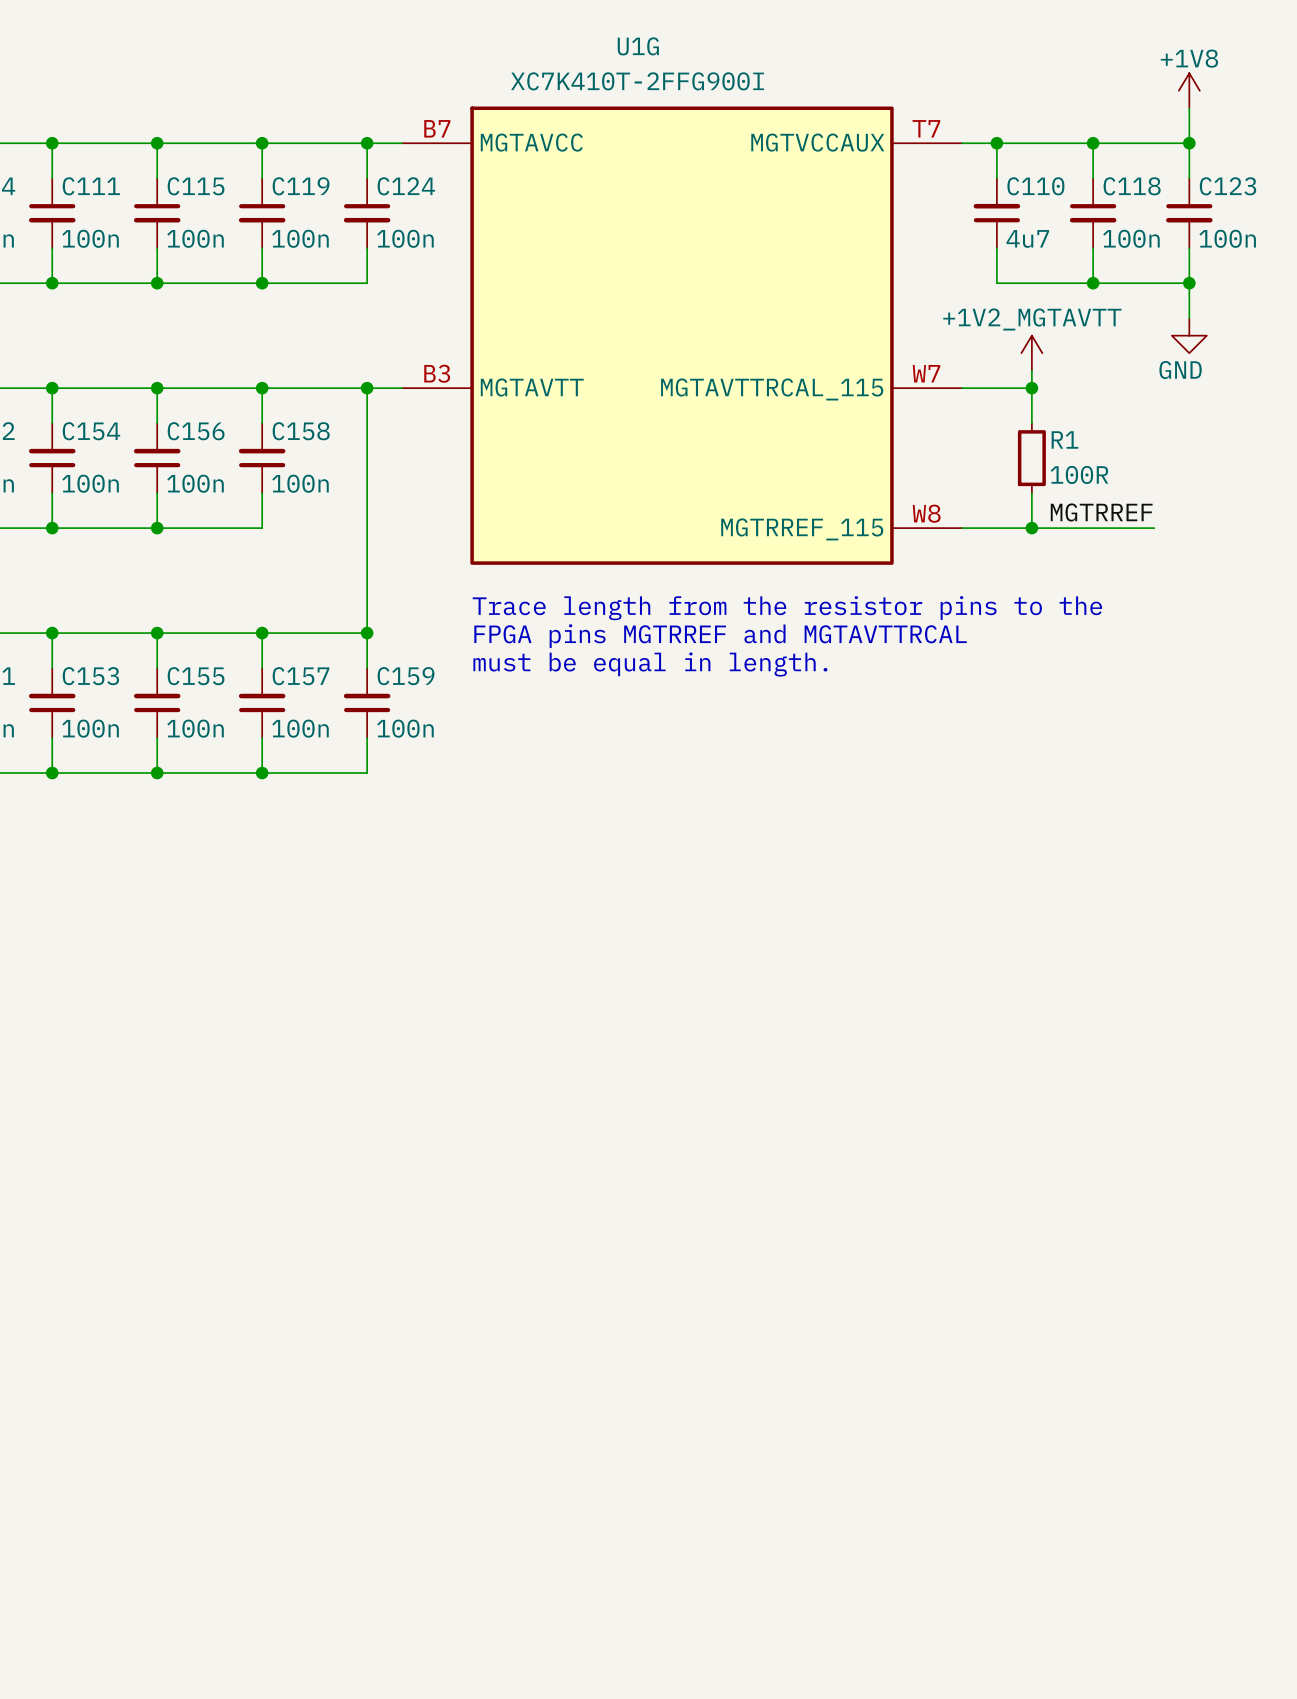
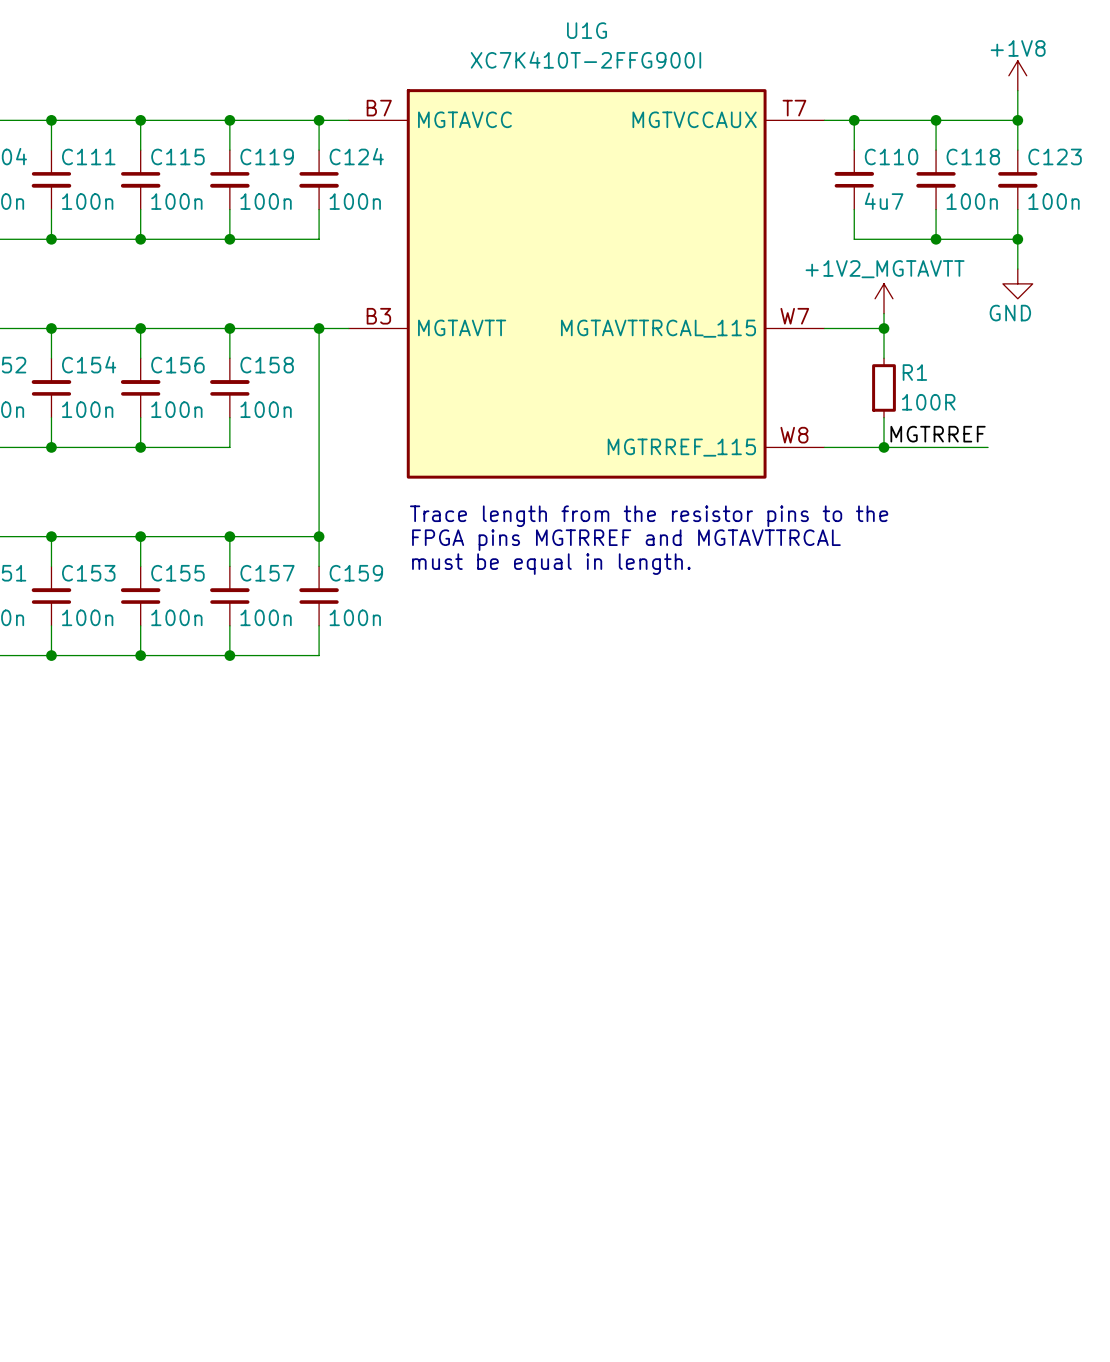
U1G name position: U1G (638, 46) -> U1G (587, 30)
U1G value position: XC7K410T-2FFG900I (637, 81) -> XC7K410T-2FFG900I (585, 59)

